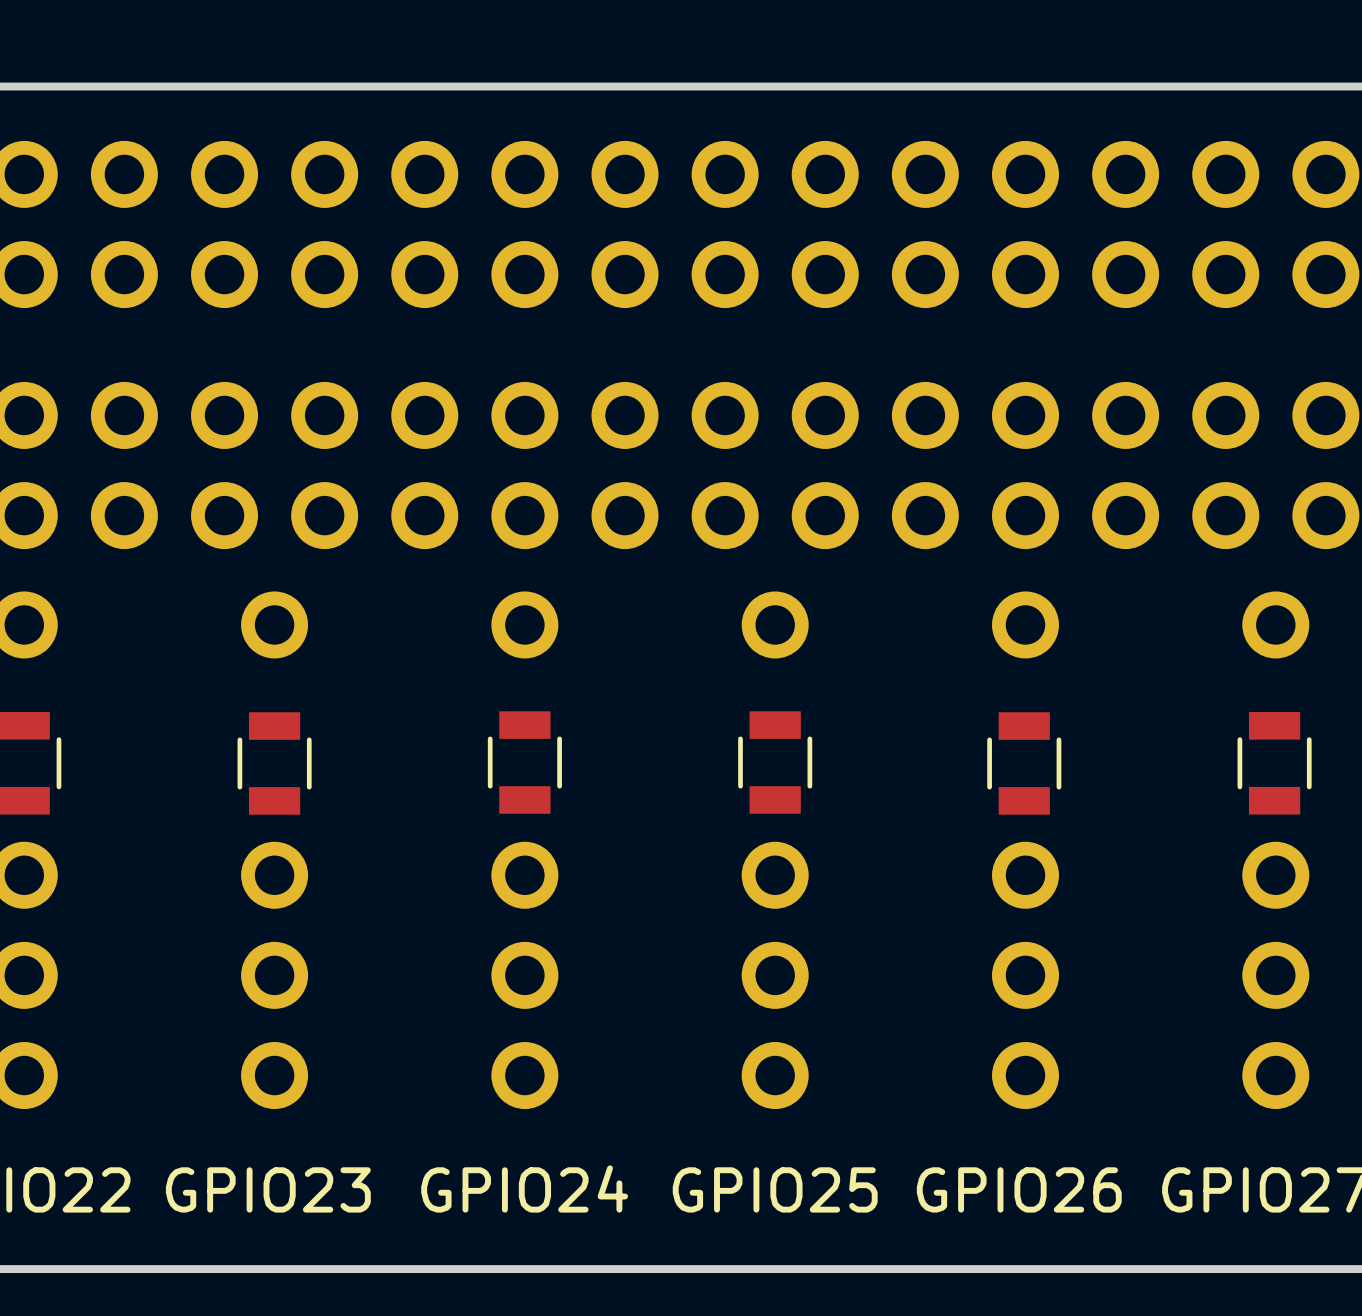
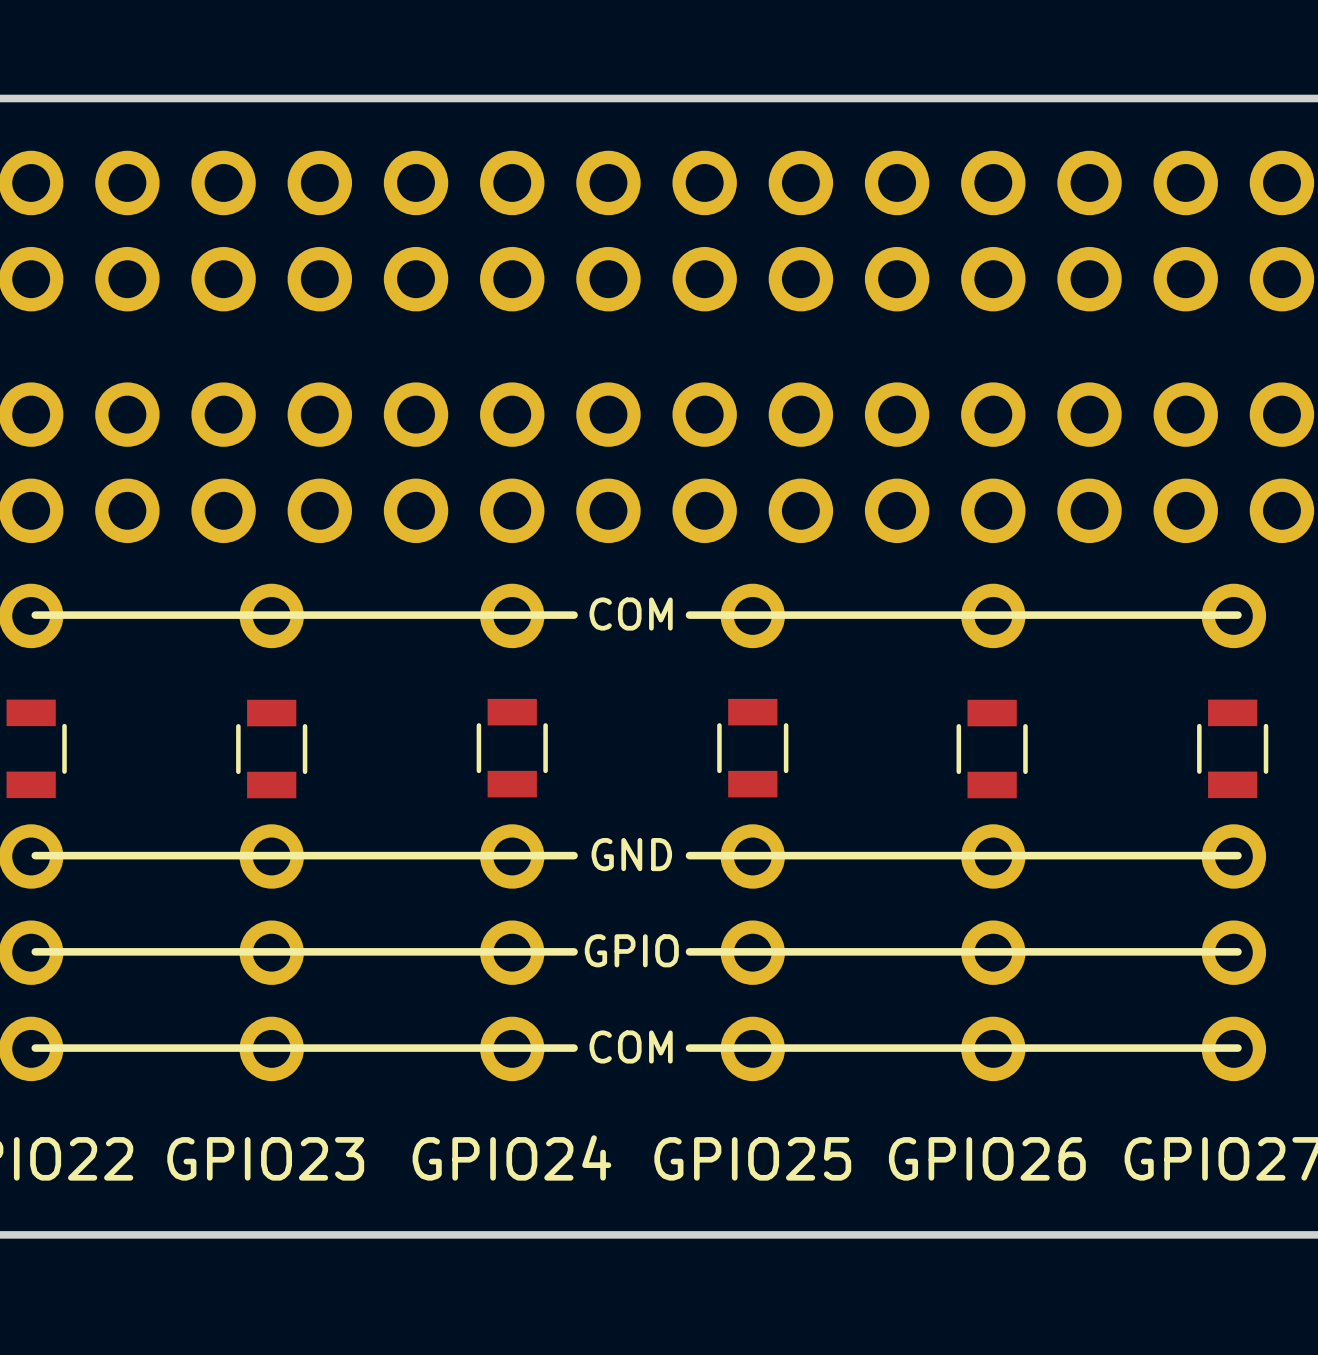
text: none -> COM (631, 614)
line: none -> (35, 615) (574, 615)
line: none -> (689, 615) (1237, 615)
text: none -> GND (631, 854)
line: none -> (35, 855) (574, 855)
line: none -> (689, 855) (1237, 855)
text: none -> GPIO (631, 950)
line: none -> (35, 951) (574, 951)
line: none -> (689, 951) (1237, 951)
text: none -> COM (631, 1047)
line: none -> (35, 1048) (574, 1048)
line: none -> (689, 1048) (1237, 1048)

